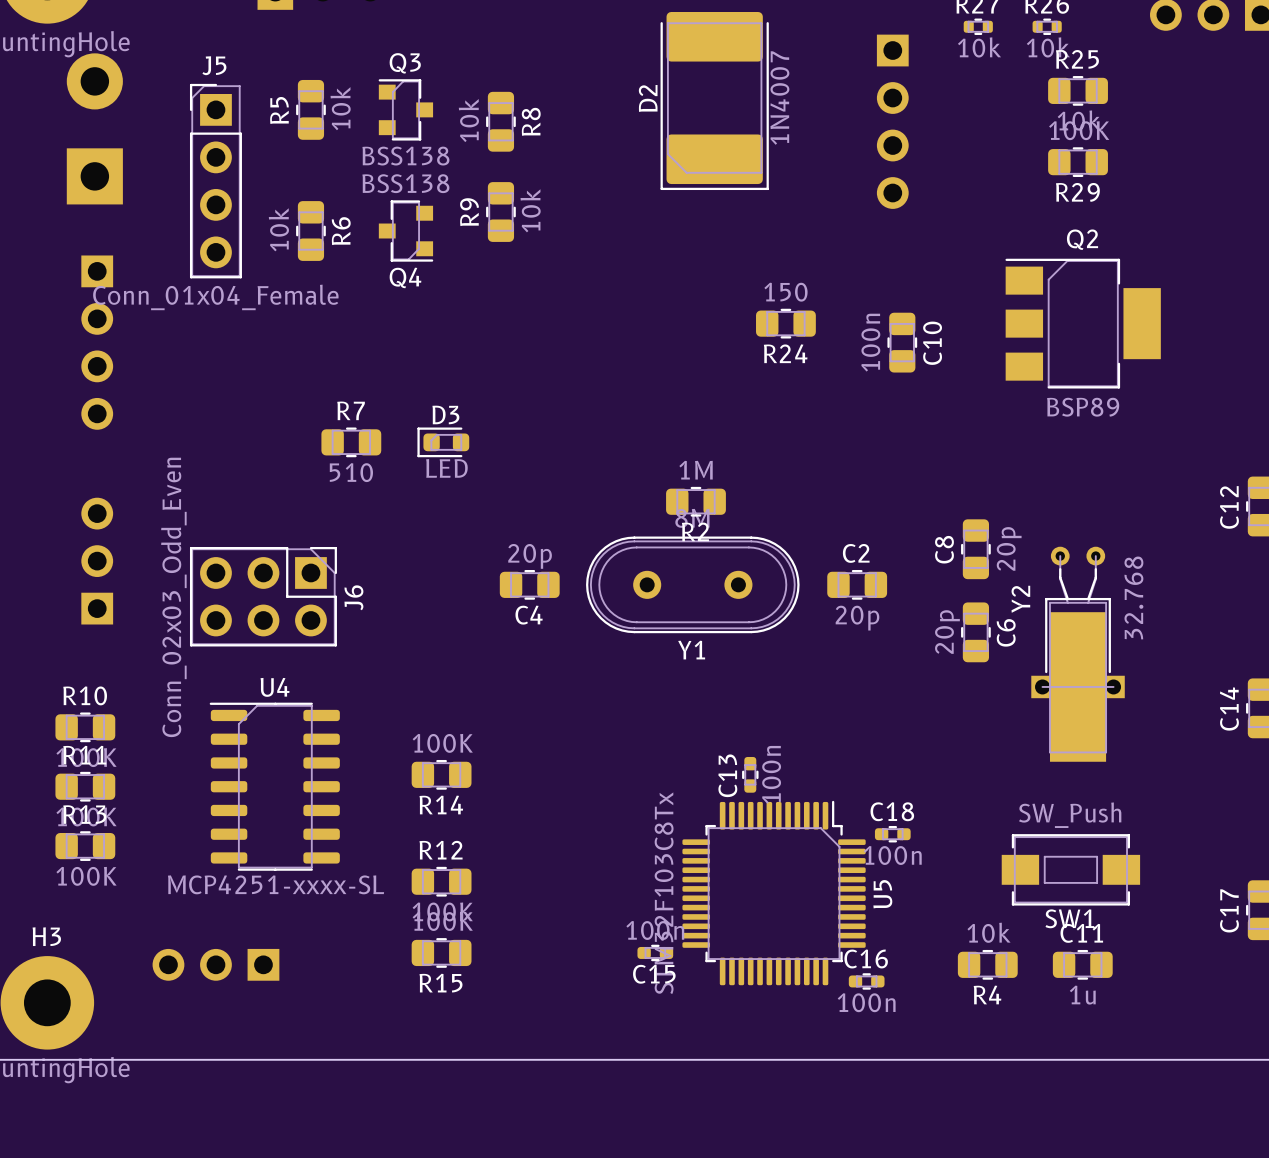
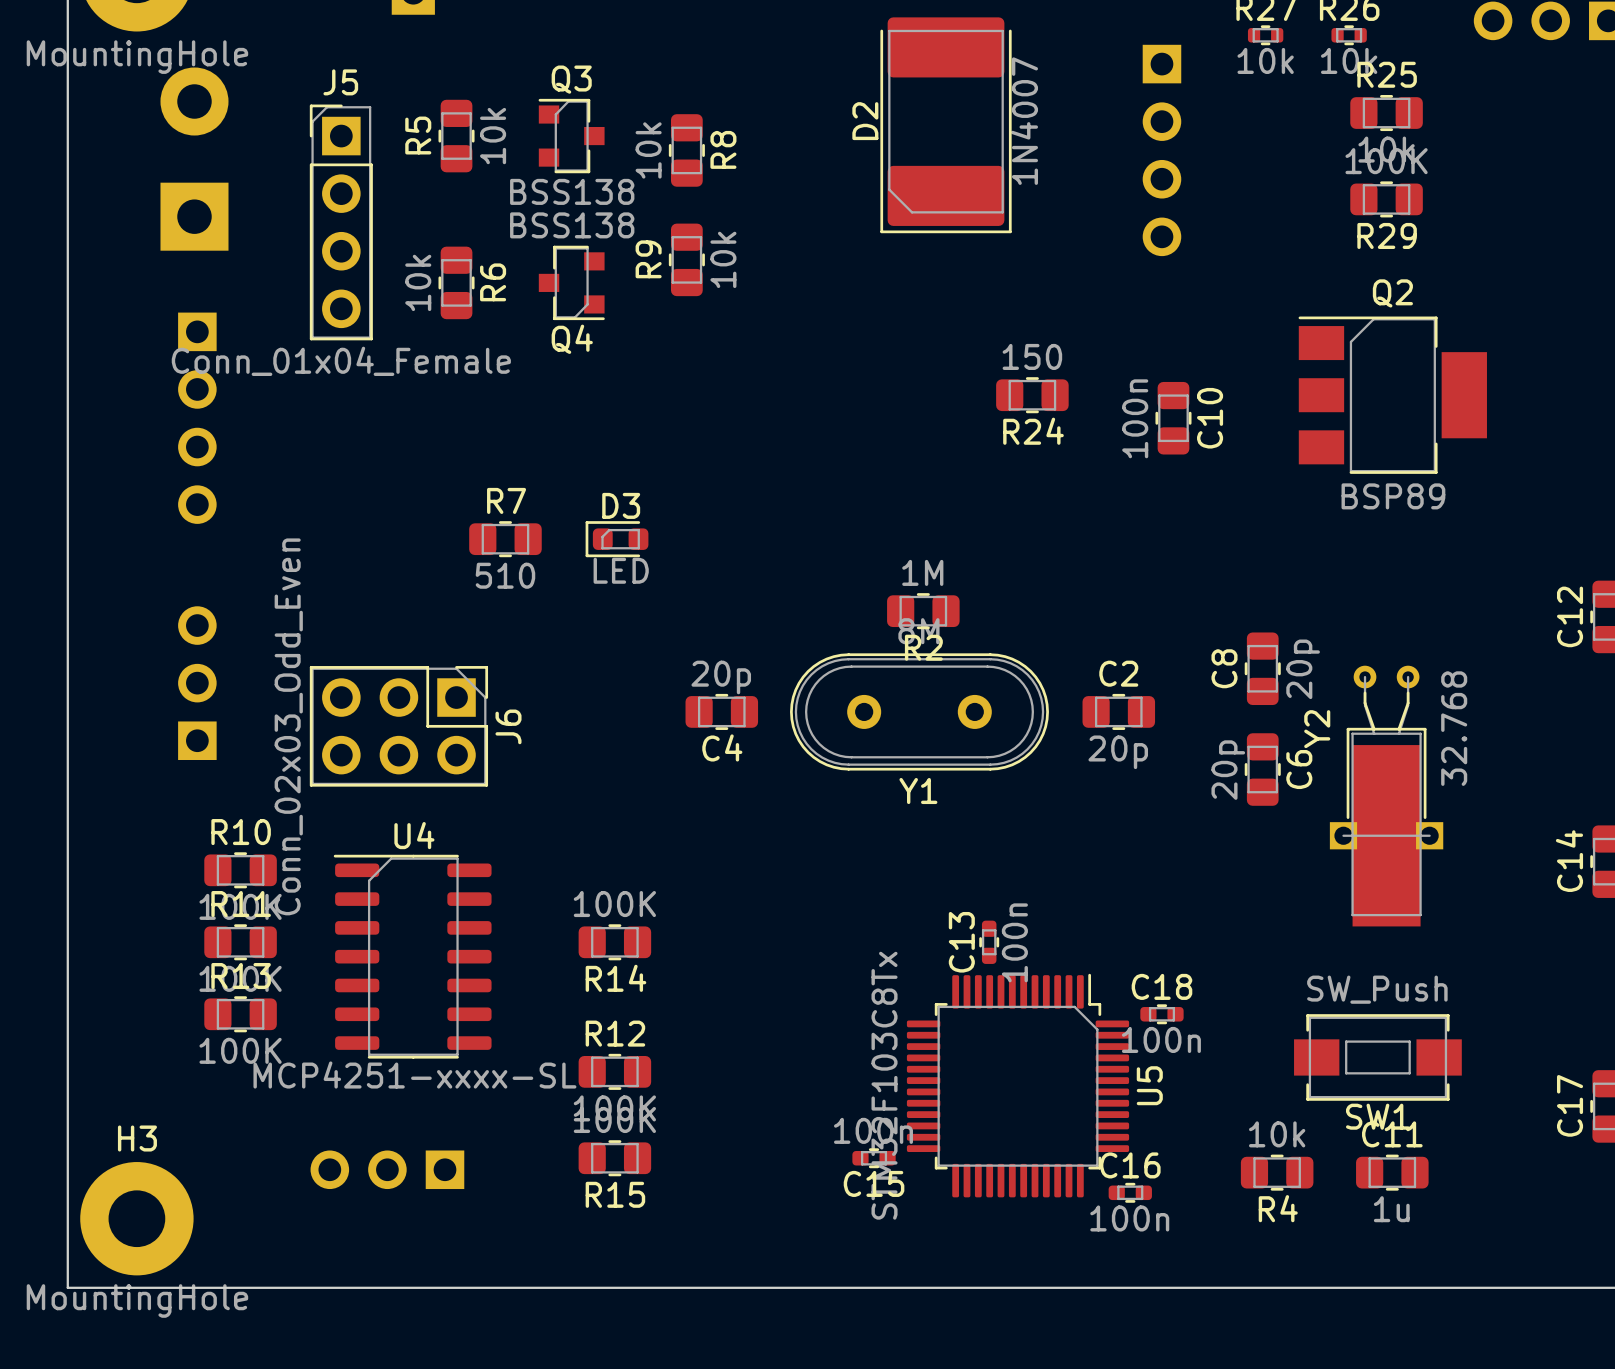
R10 position: (85, 727) -> (240, 870)
R11 position: (85, 786) -> (240, 942)
R13 position: (85, 846) -> (240, 1014)
part position: (215, 964) -> (387, 1169)

